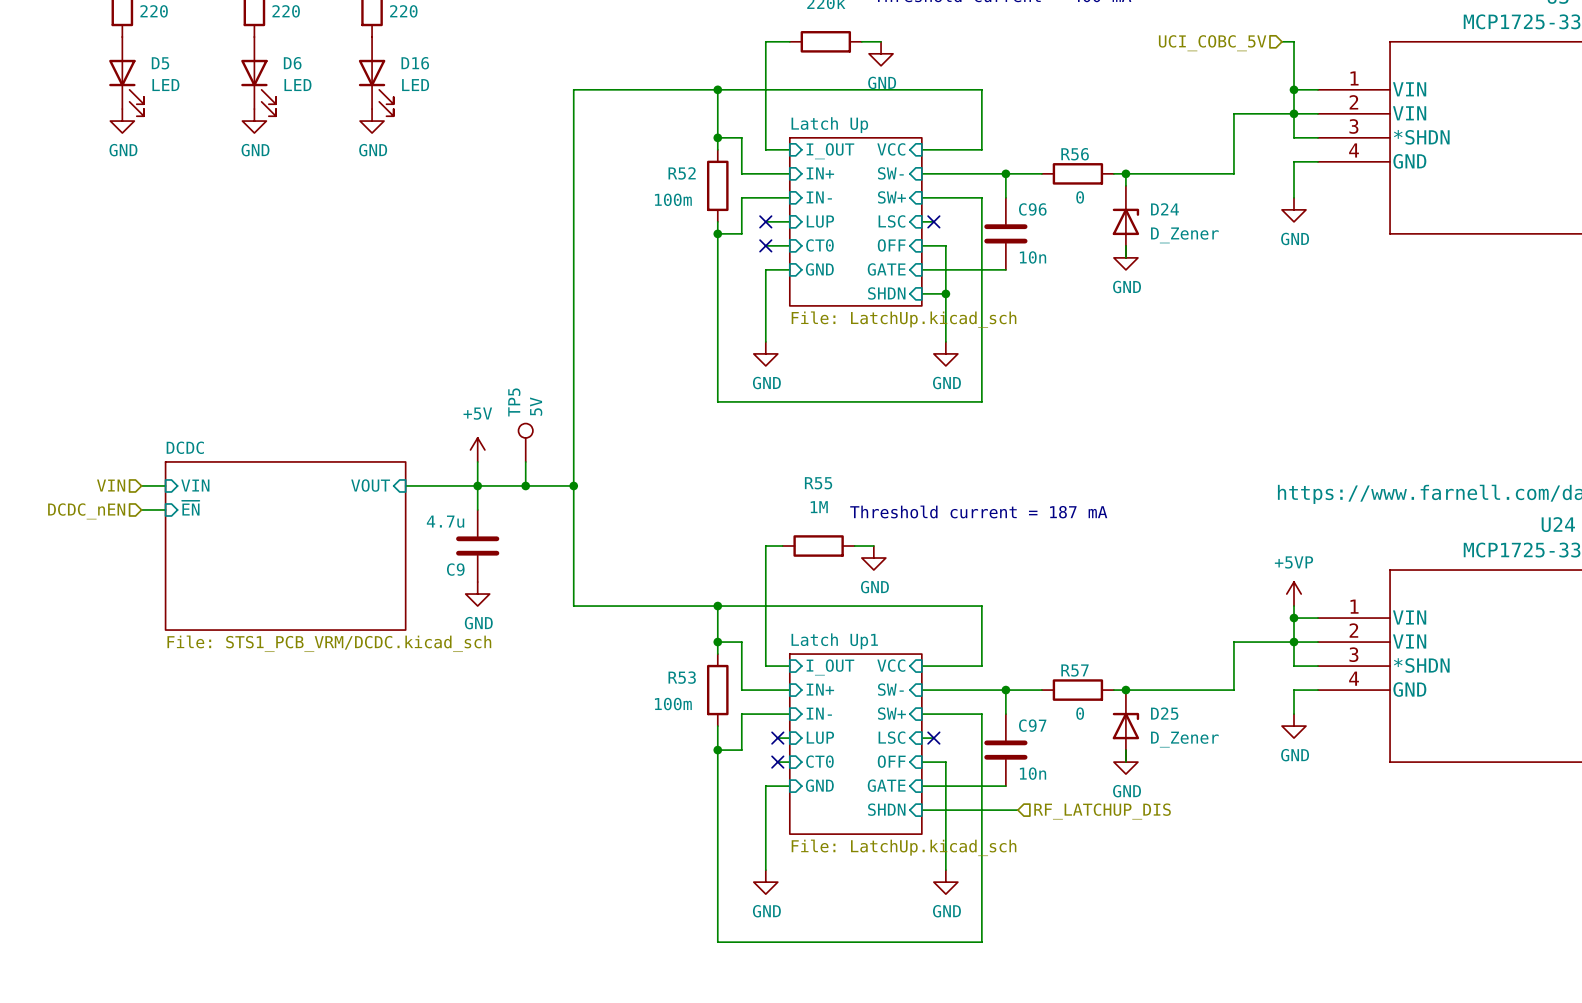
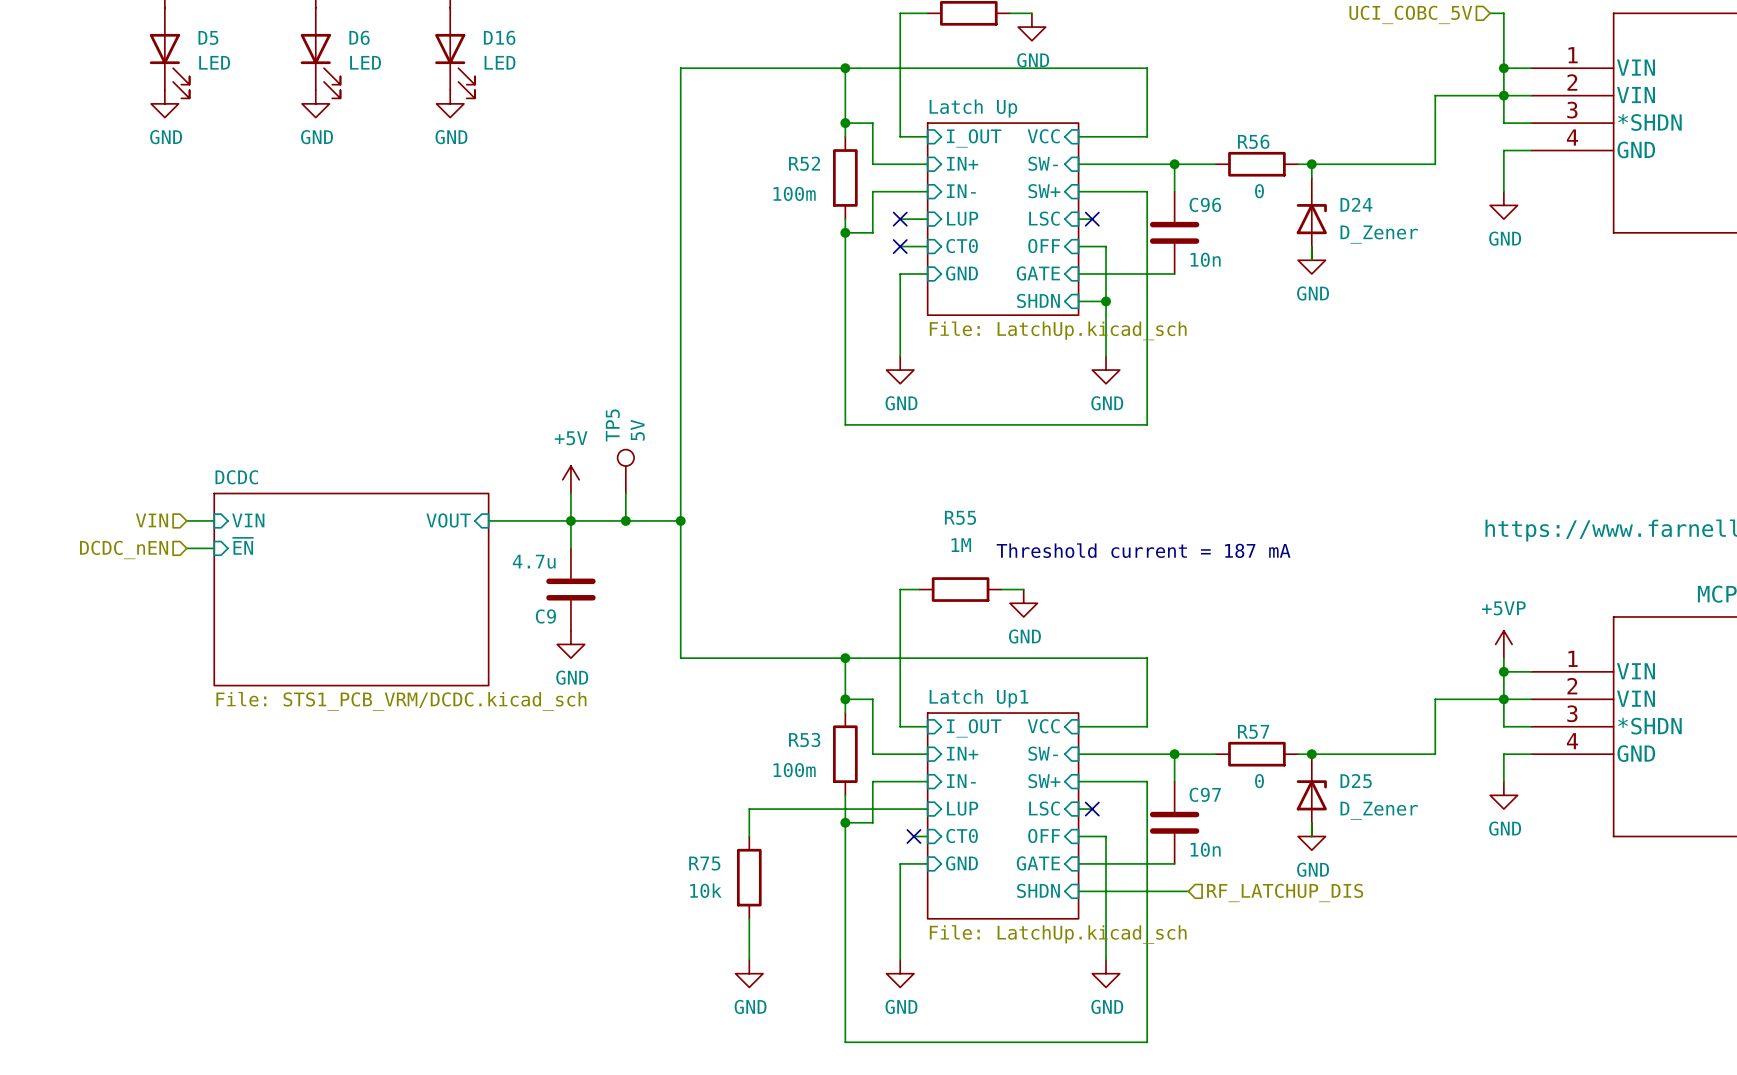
wire: none -> (913, 809) (749, 809) (749, 836)
no-connect mark: (777, 738) -> none
R75: none -> 10k (749, 877)
wire: none -> (749, 918) (749, 959)
power symbol: none -> GND (749, 973)

